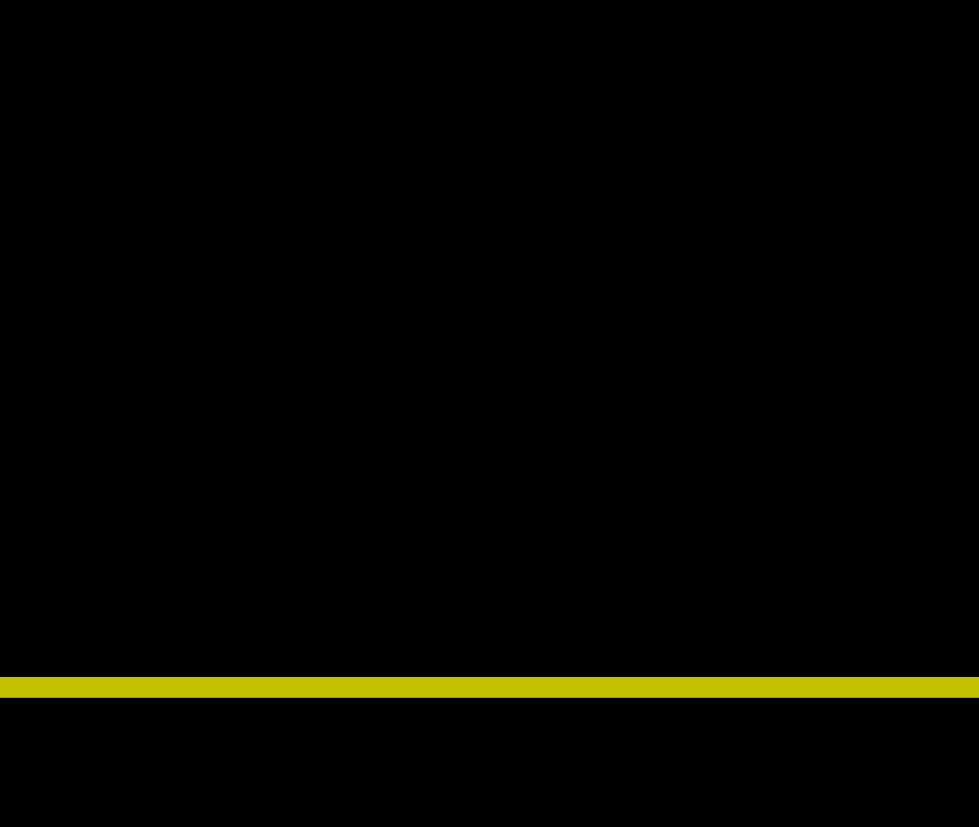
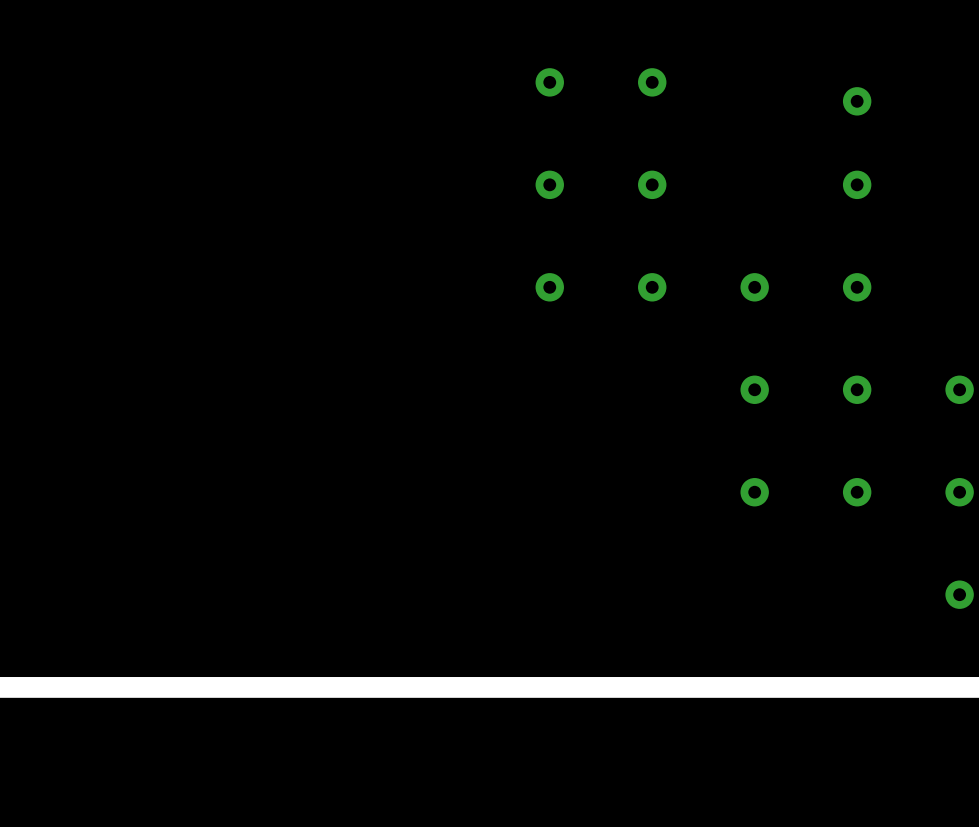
via: none -> (549, 82)
via: none -> (652, 82)
via: none -> (857, 101)
via: none -> (549, 184)
via: none -> (652, 184)
via: none -> (857, 184)
via: none -> (549, 287)
via: none -> (652, 287)
via: none -> (754, 287)
via: none -> (857, 287)
via: none -> (754, 389)
via: none -> (857, 389)
via: none -> (959, 389)
via: none -> (754, 492)
via: none -> (857, 492)
via: none -> (959, 492)
via: none -> (959, 594)

